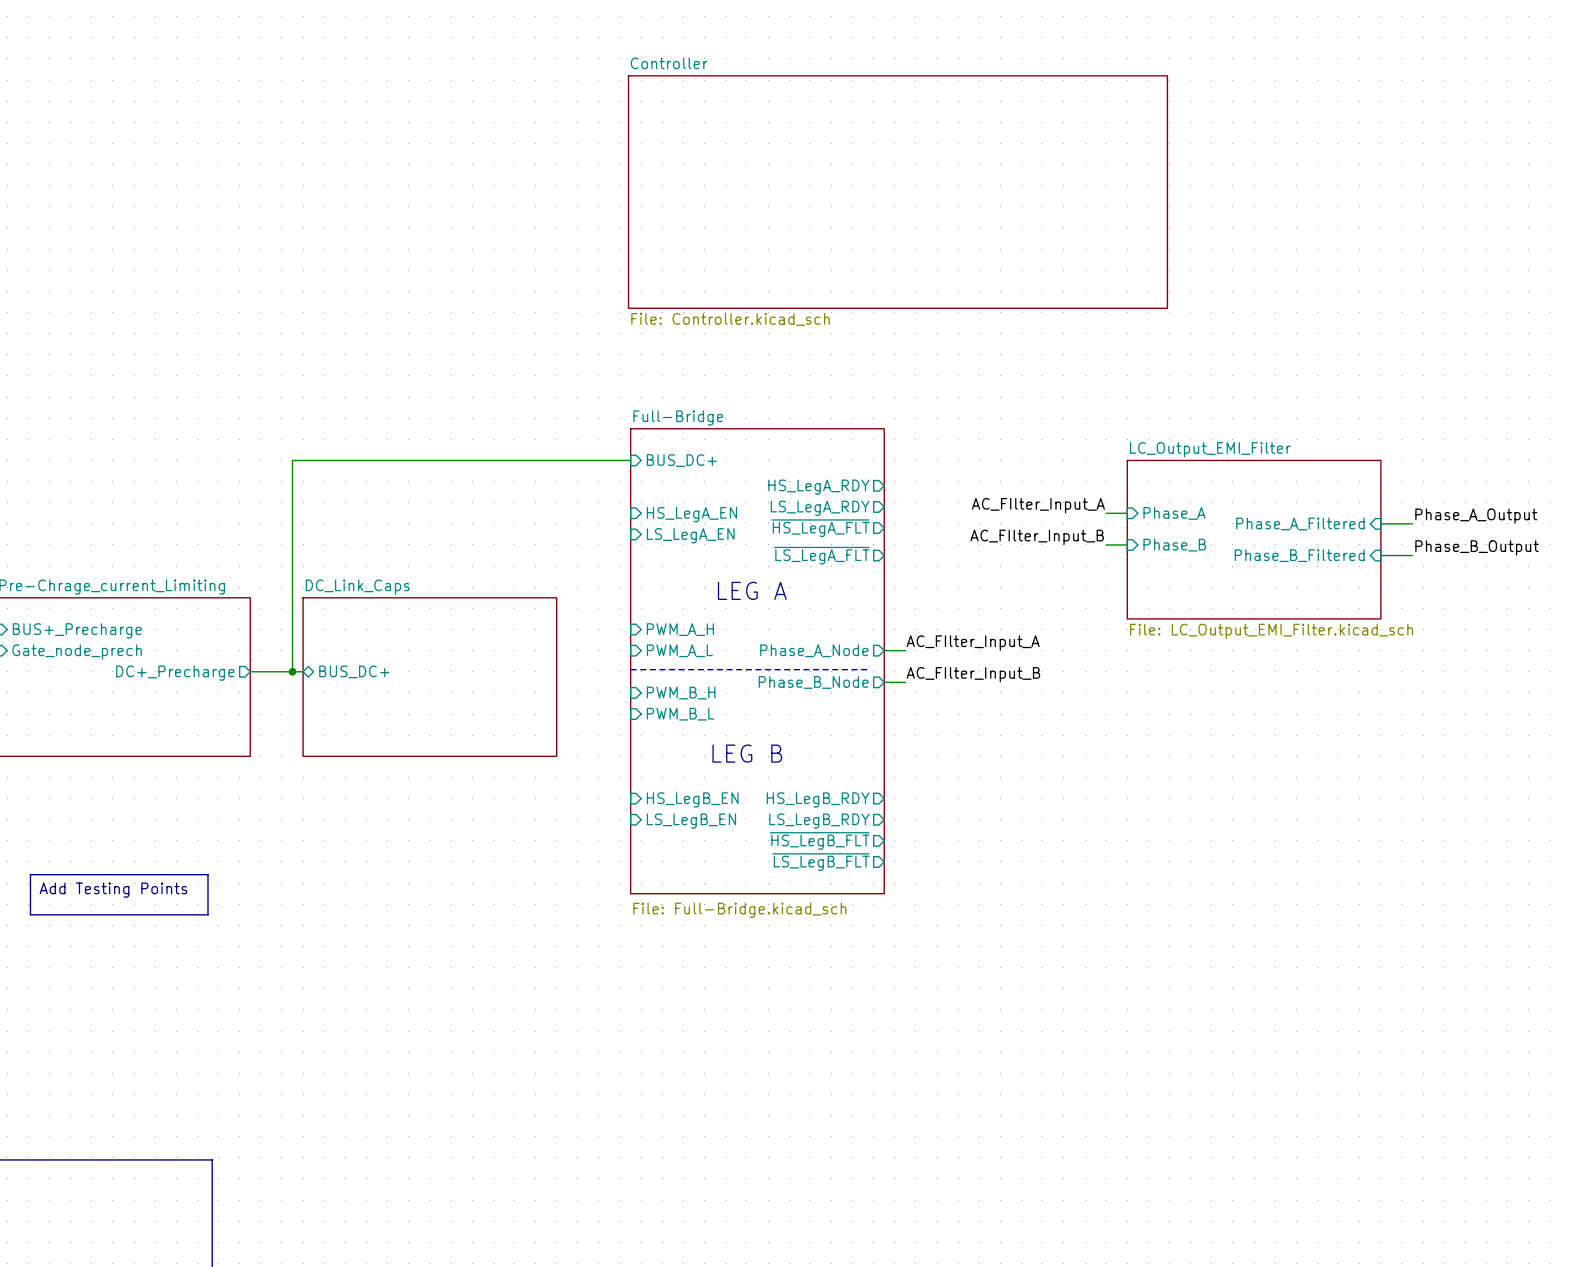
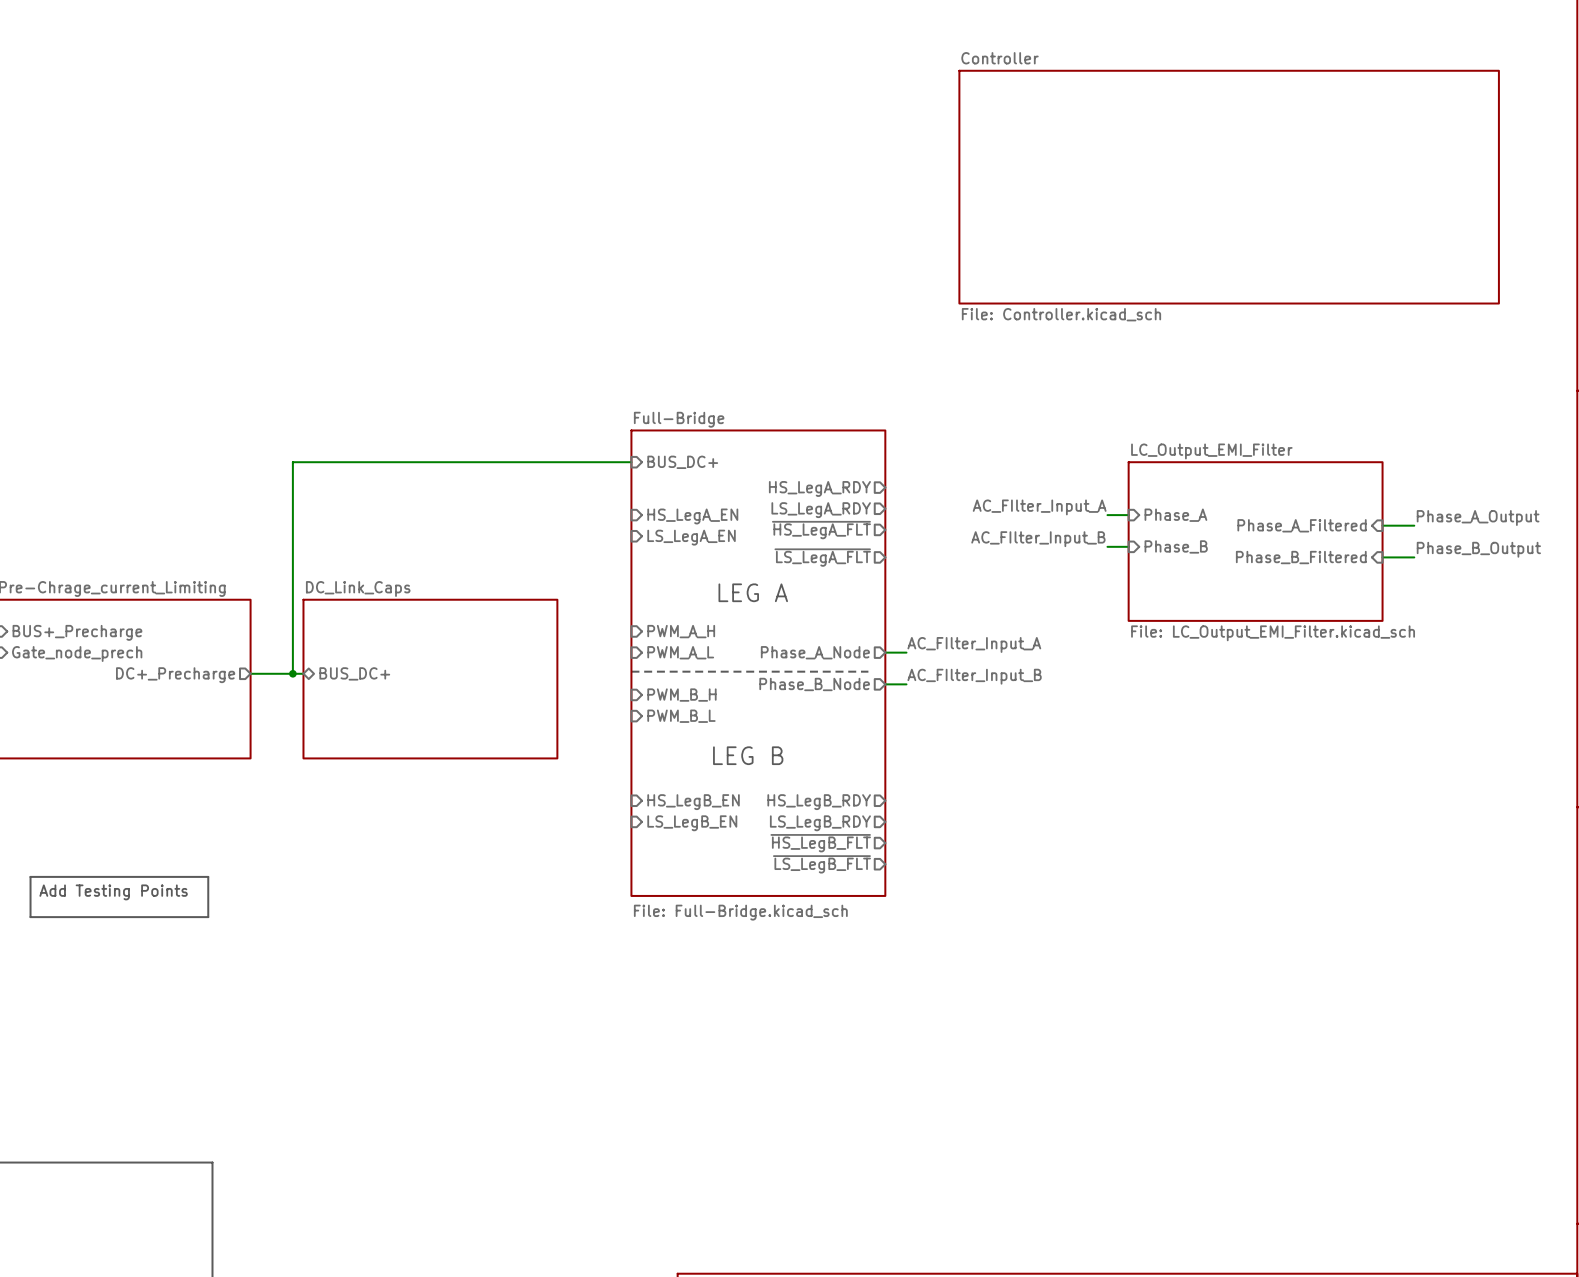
sheet Controller: none -> File: Controller.kicad_sch (1229, 187)
sheet Controller: File: Controller.kicad_sch (897, 192) -> none

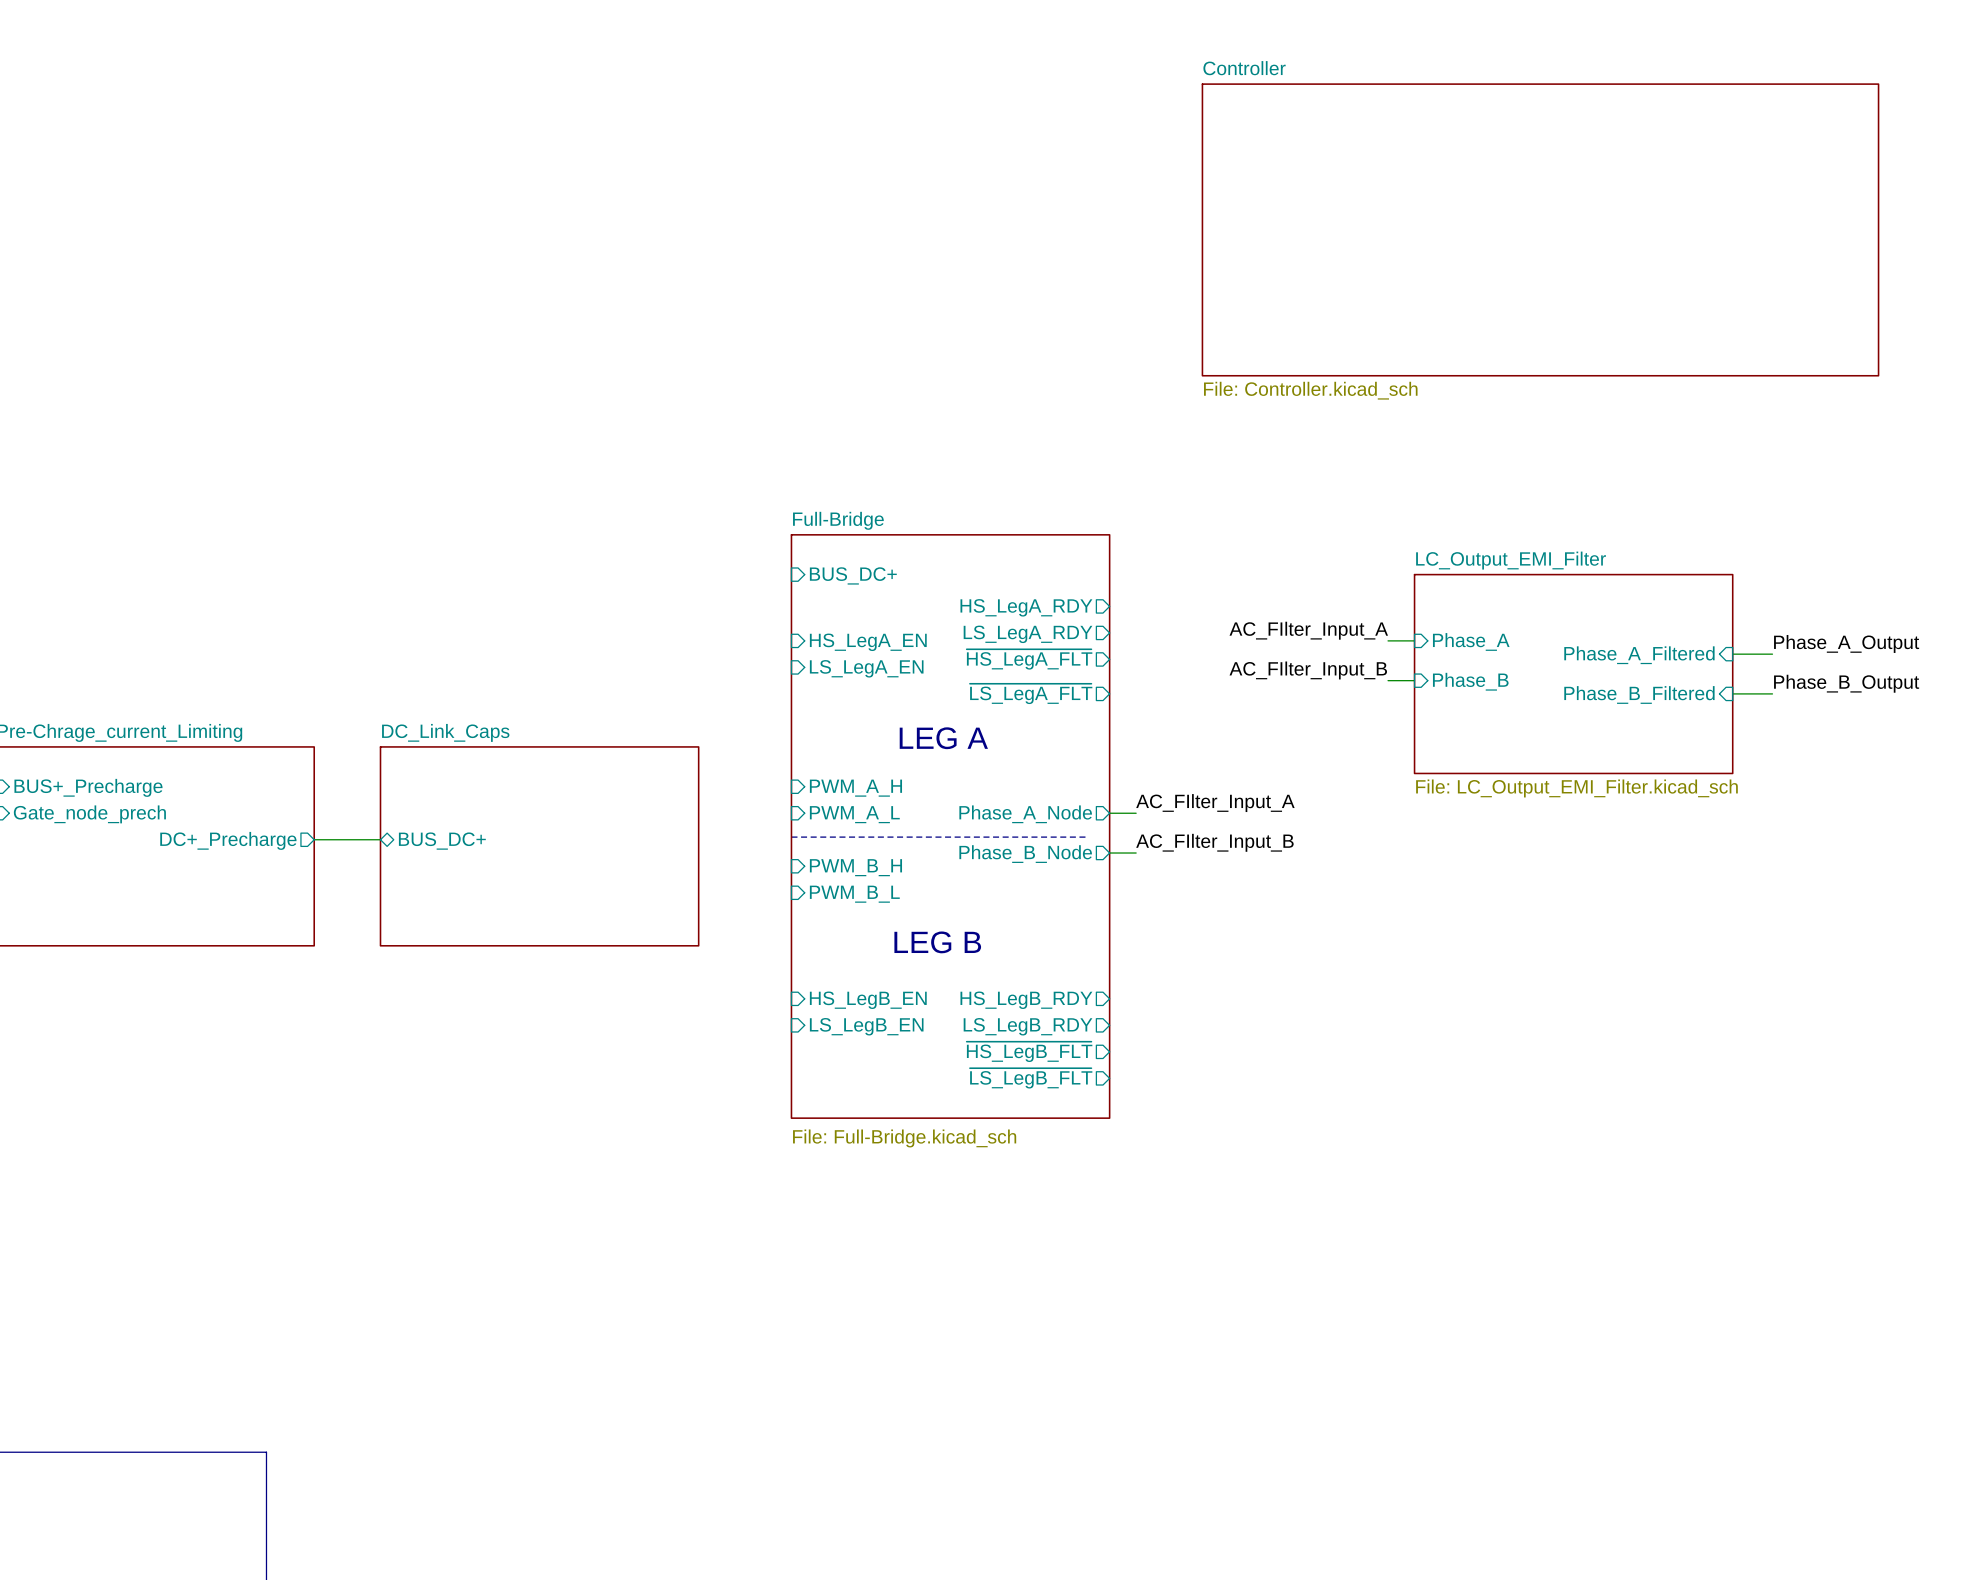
wire: (631, 462) (292, 462) (292, 673) -> none
junction: (292, 673) -> none
line: (30, 876) (208, 876) (208, 917) (30, 917) (30, 876) -> none
text: Add Testing Points (113, 892) -> none

